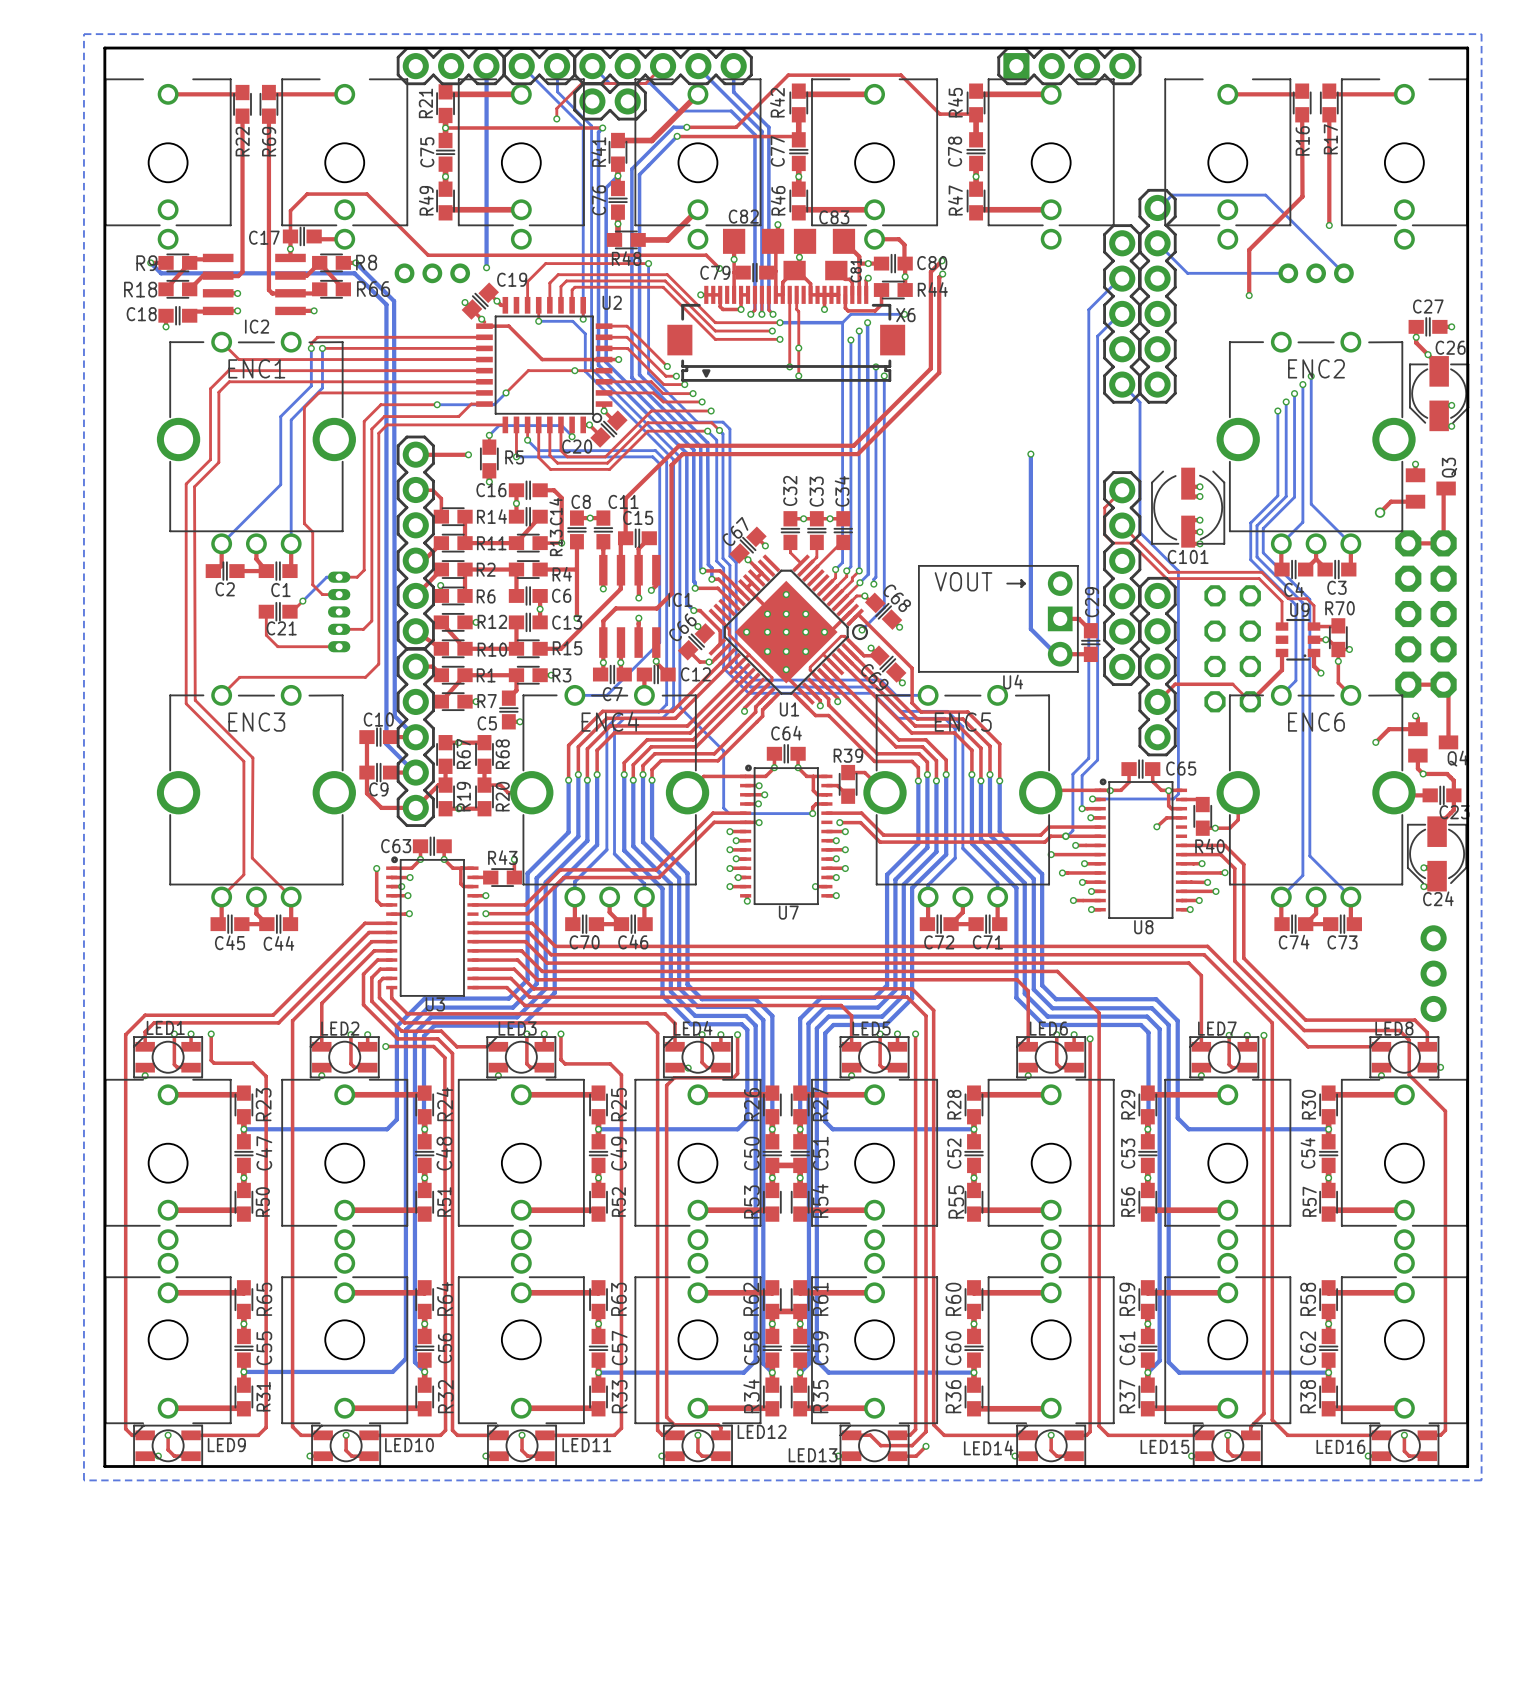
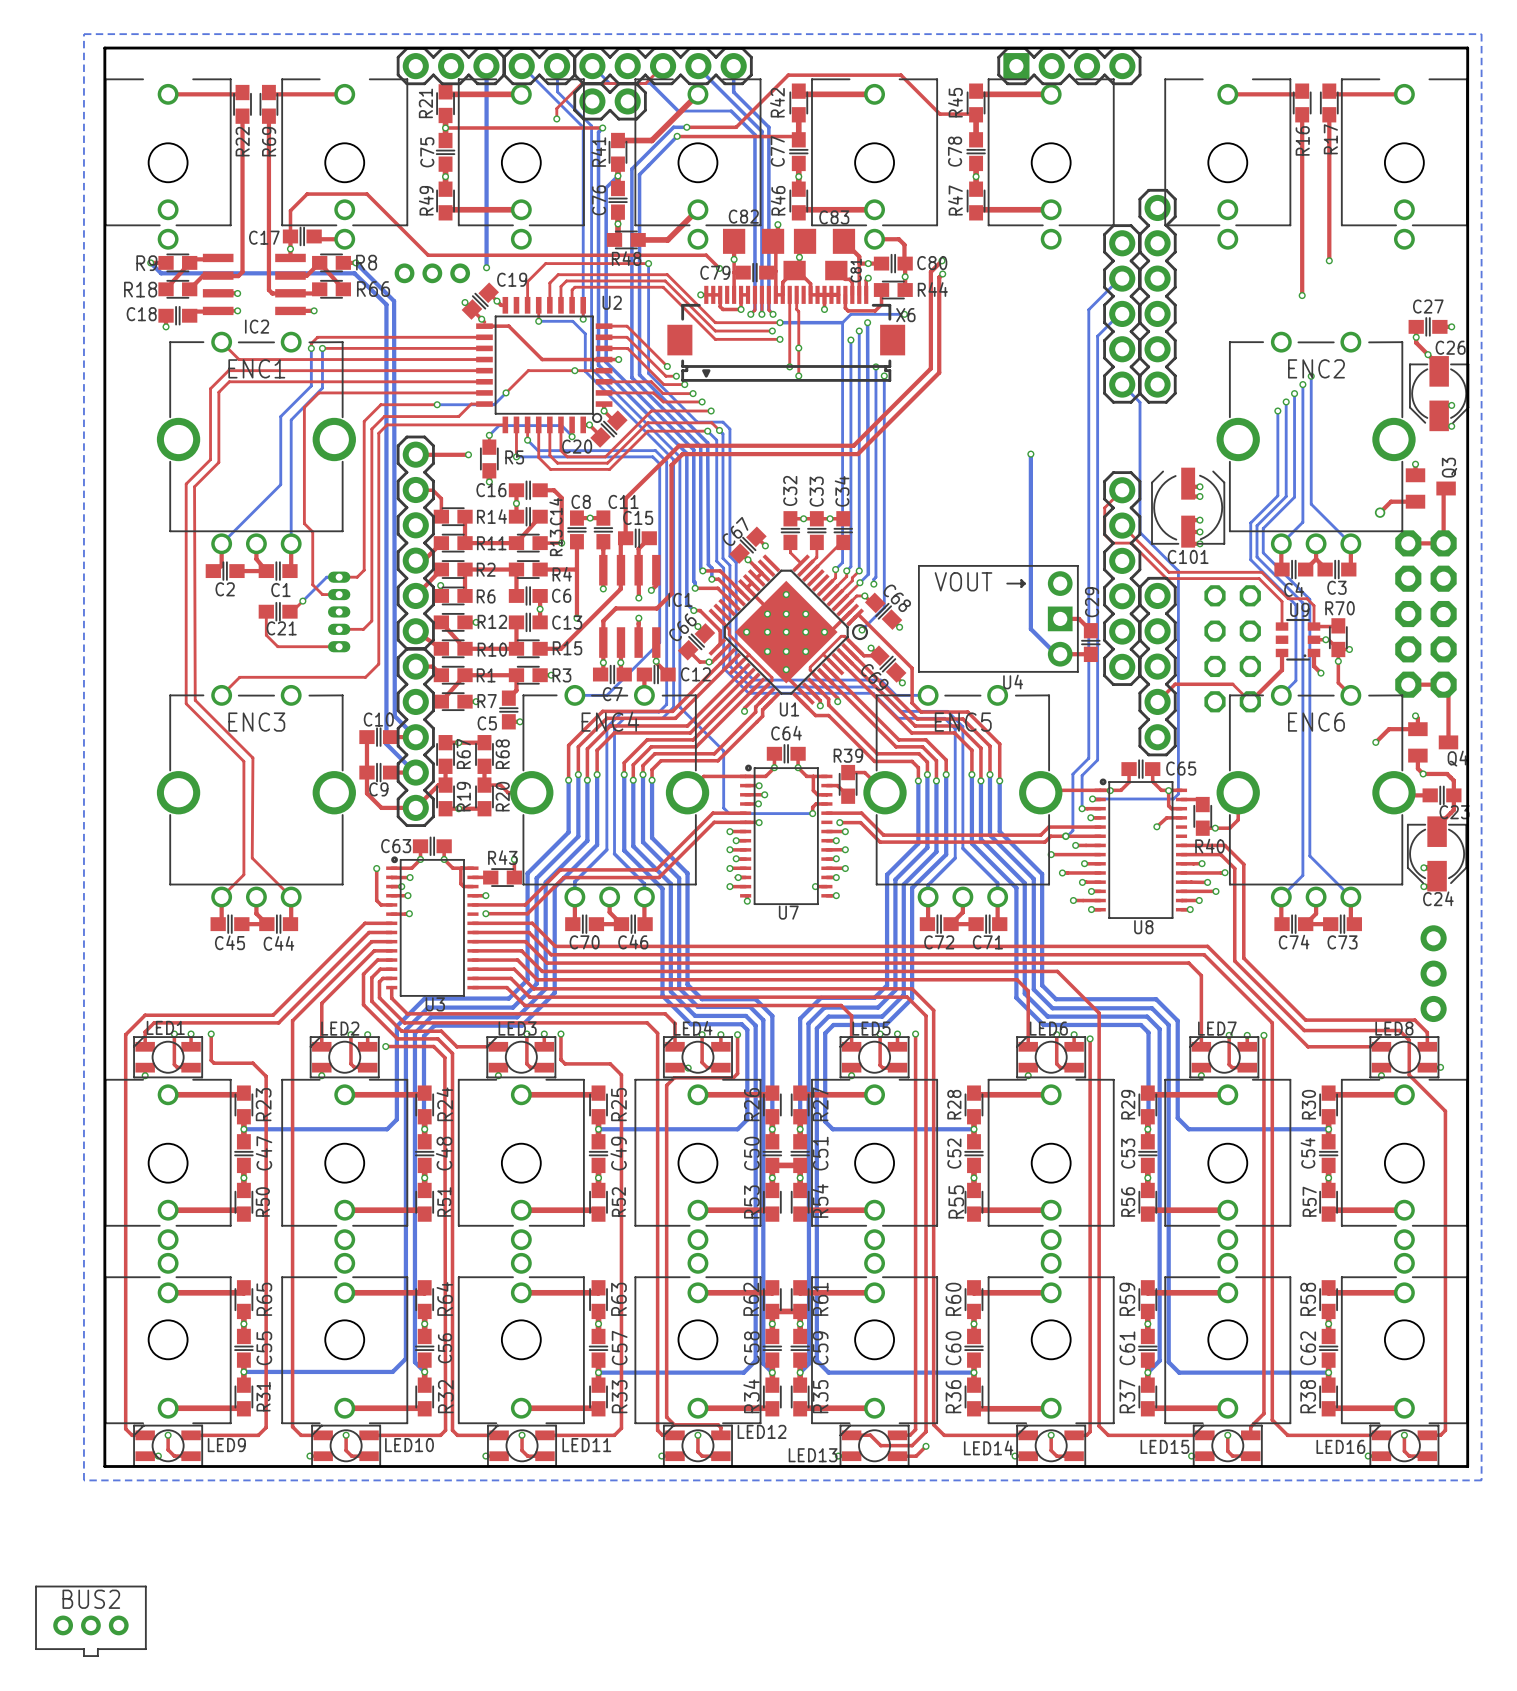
top track: (1302, 114) (1302, 196) (1249, 249) (1249, 295) -> (1302, 114) (1302, 295)
bottom track: (1157, 207) (1172, 195) (1265, 195) (1343, 273) -> none
top track: none -> (1329, 225) (1329, 260)
via position: (1329, 225) -> (1329, 260)
bottom track: (1157, 243) (1187, 273) (1288, 273) -> none
part: (1316, 273) -> none
via: (1249, 295) -> none
via: none -> (1302, 295)
BUS2: none -> (90, 1621)

